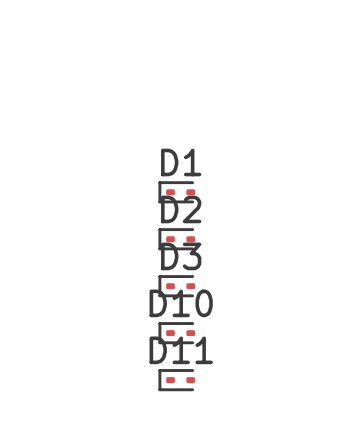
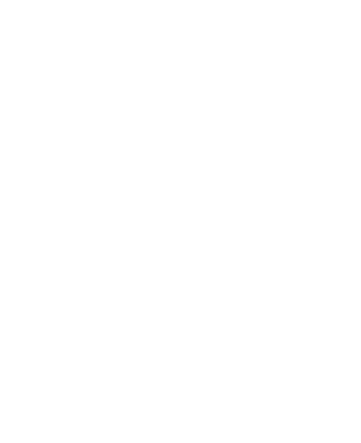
D1: (176, 192) -> none
D2: (176, 239) -> none
D3: (176, 286) -> none
D10: (176, 333) -> none
D11: (176, 380) -> none

